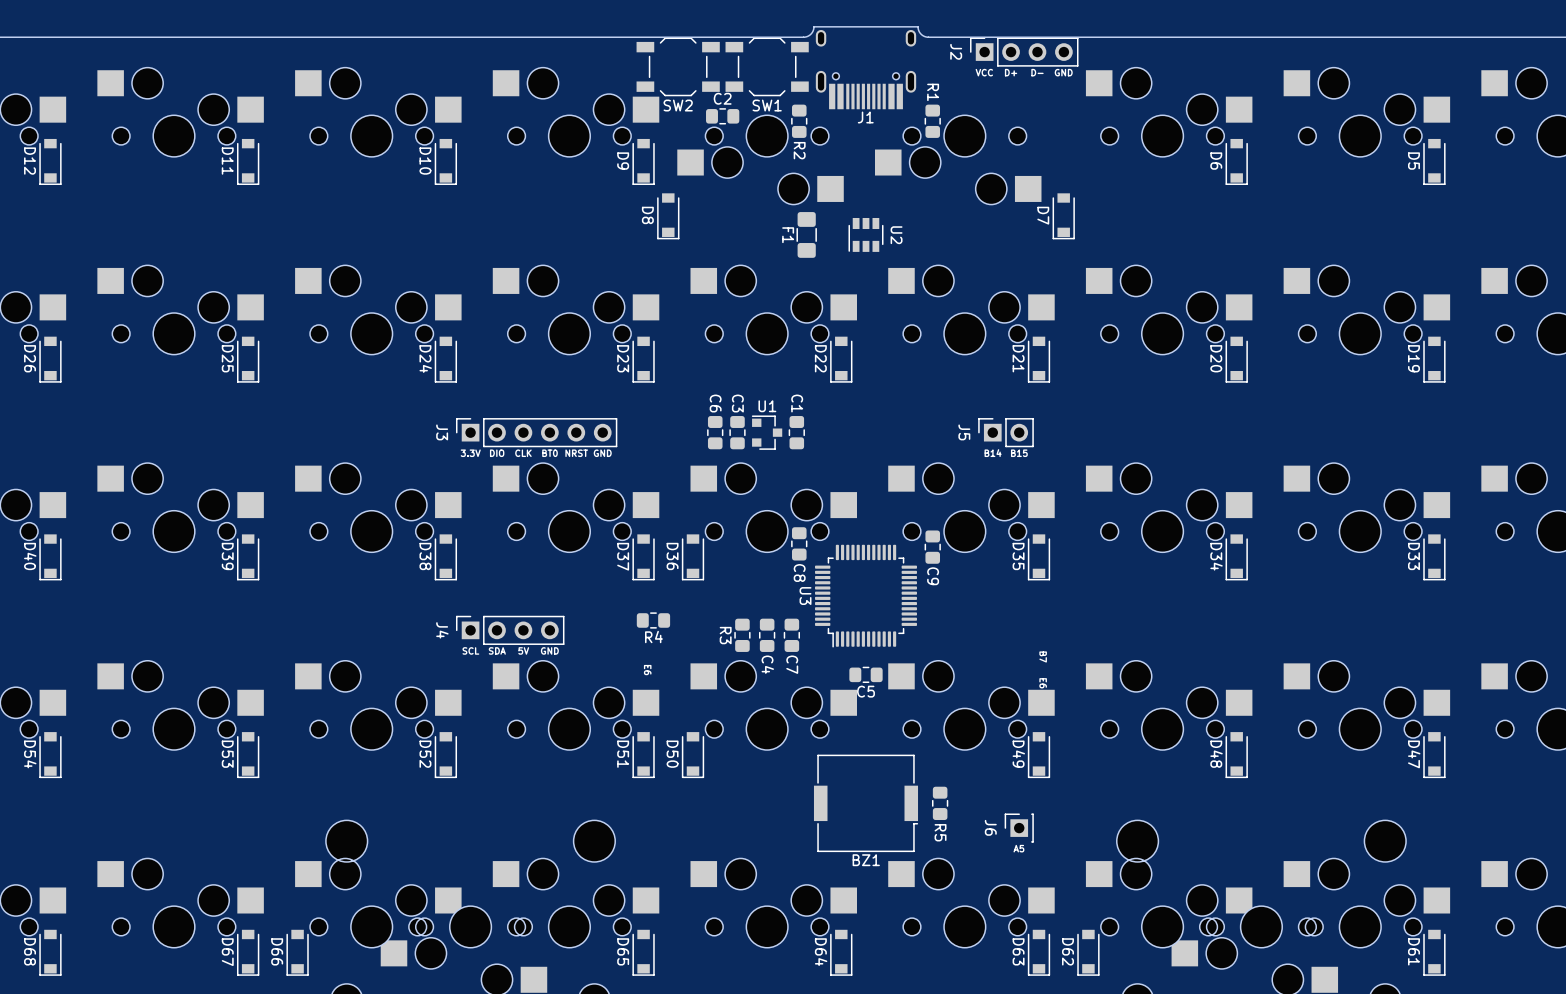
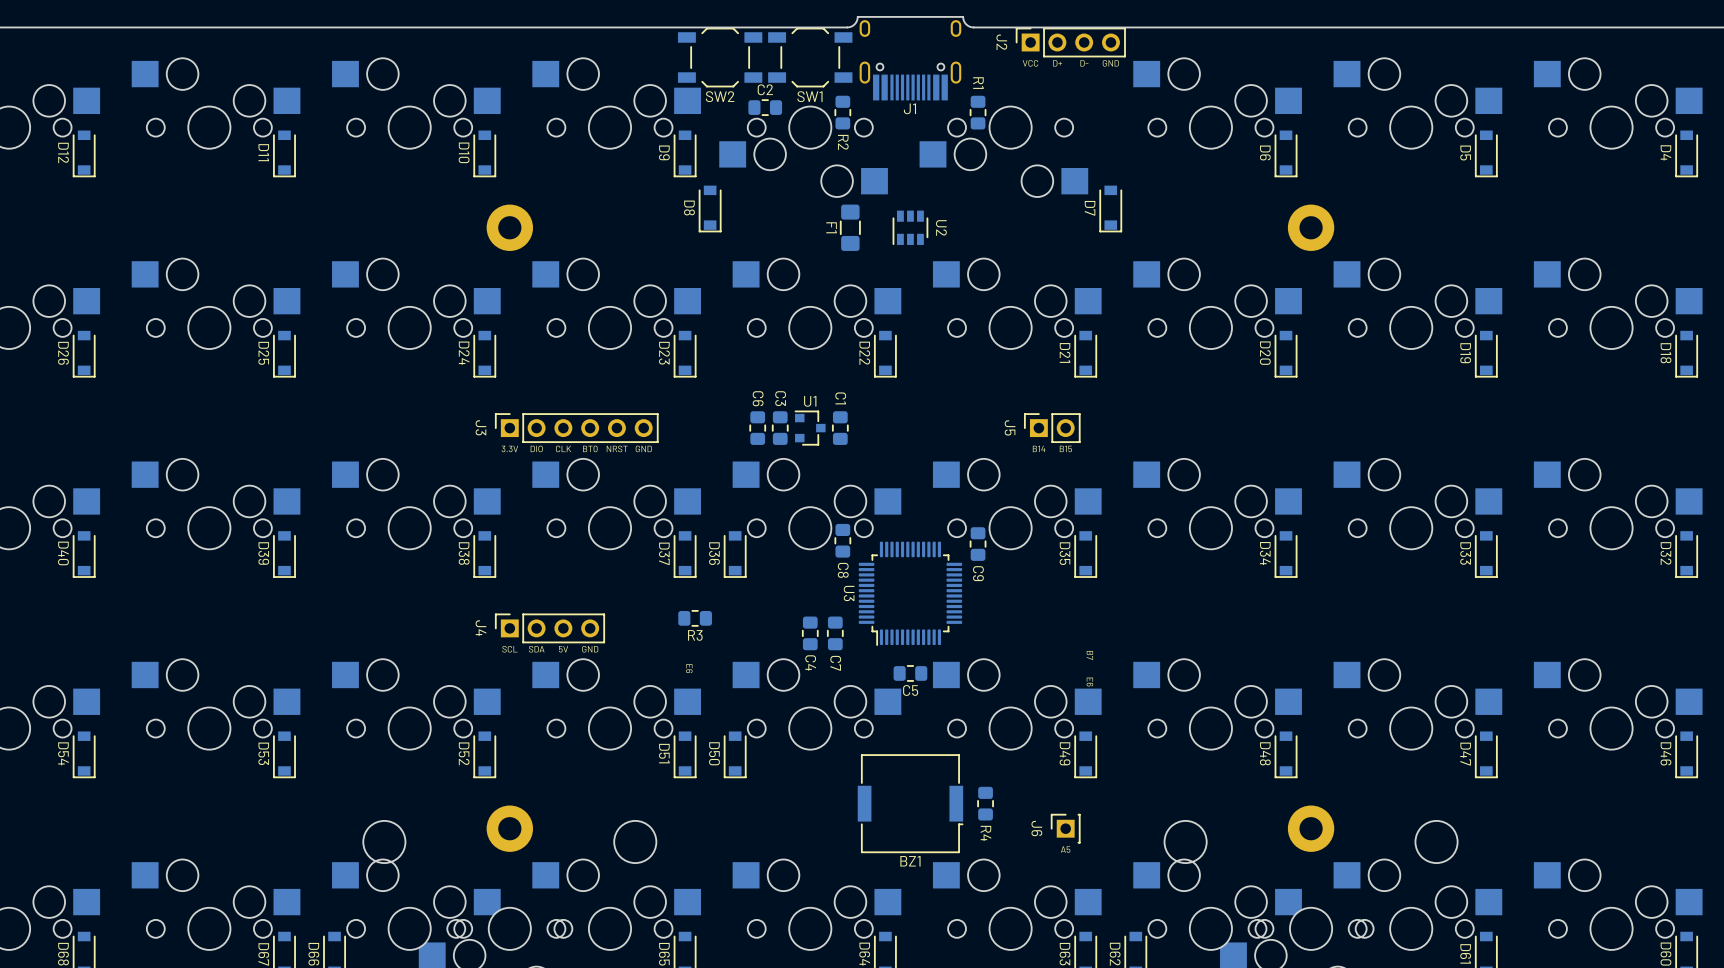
part: none -> (509, 227)
part: none -> (1311, 227)
R3: (742, 635) -> none
R4 name: R4 (653, 637) -> R3 (695, 635)
part: none -> (509, 828)
part: none -> (1311, 828)
R5 name: R5 (940, 832) -> R4 (985, 833)

